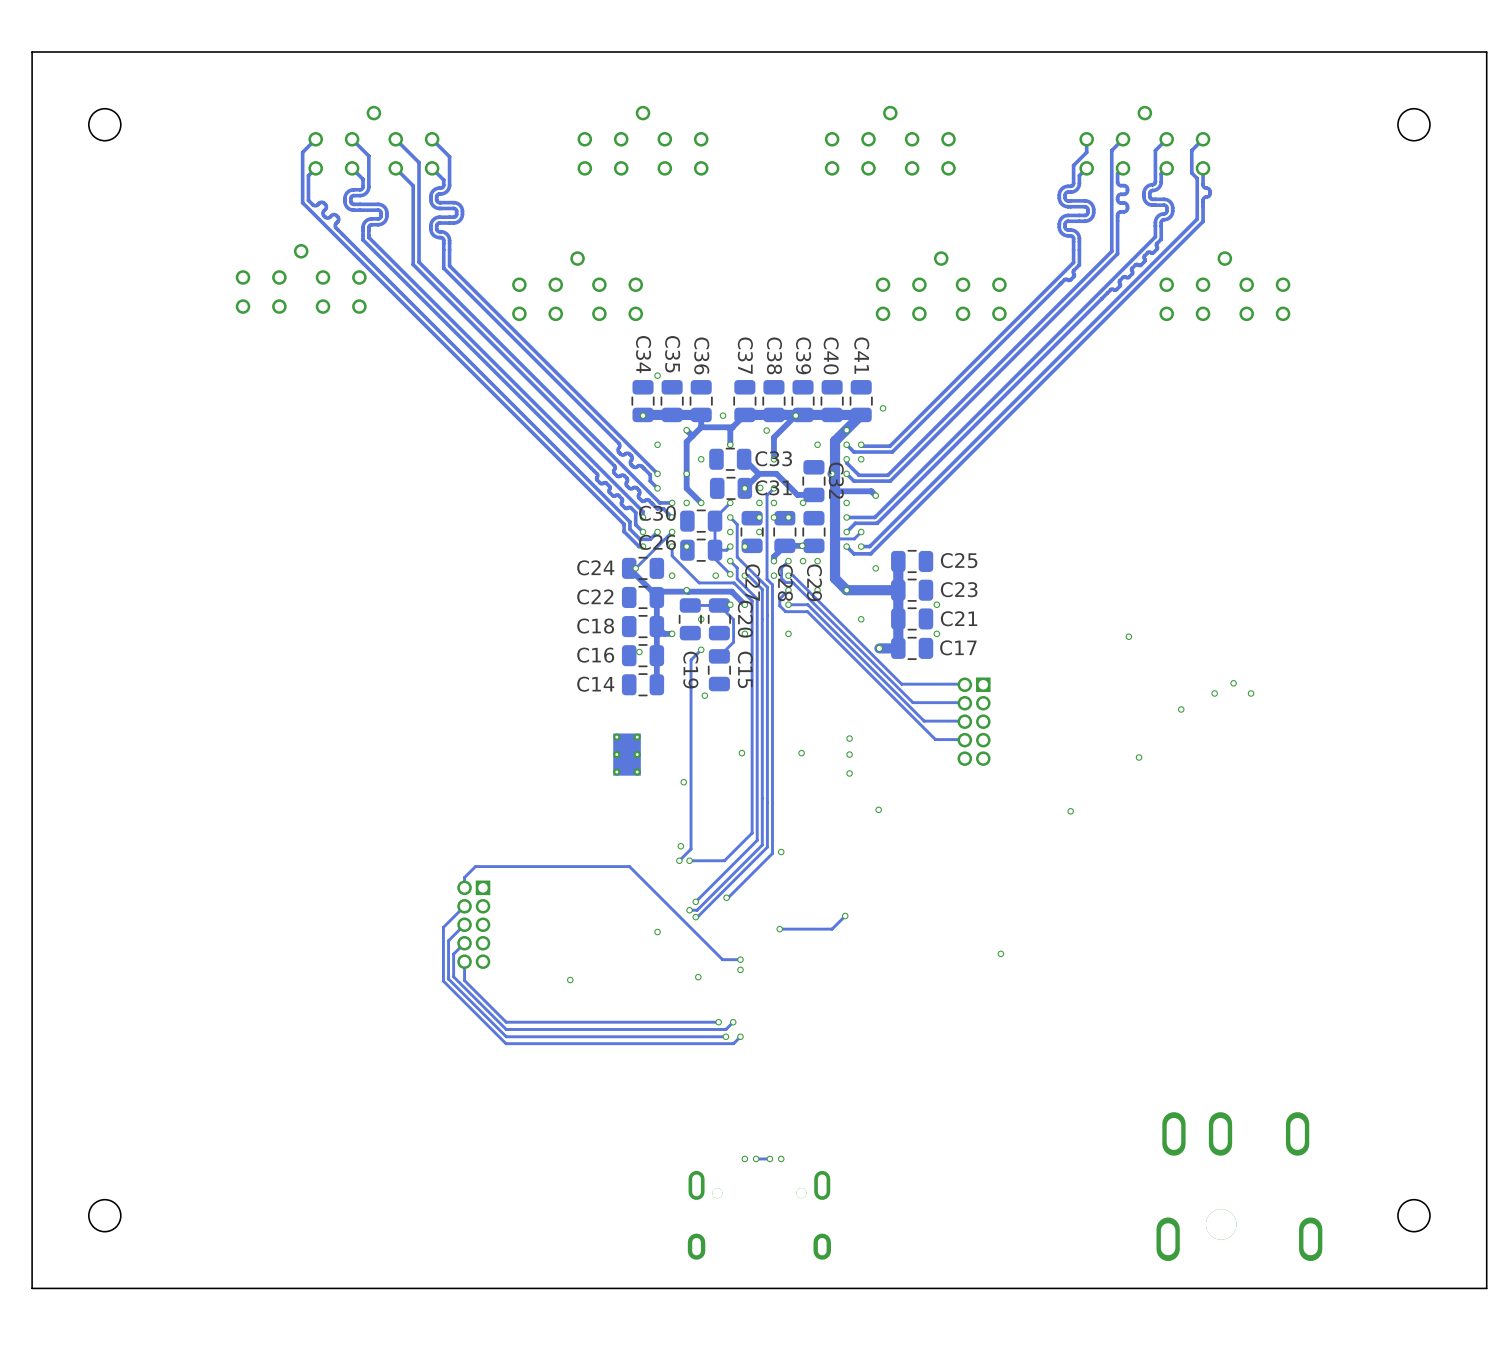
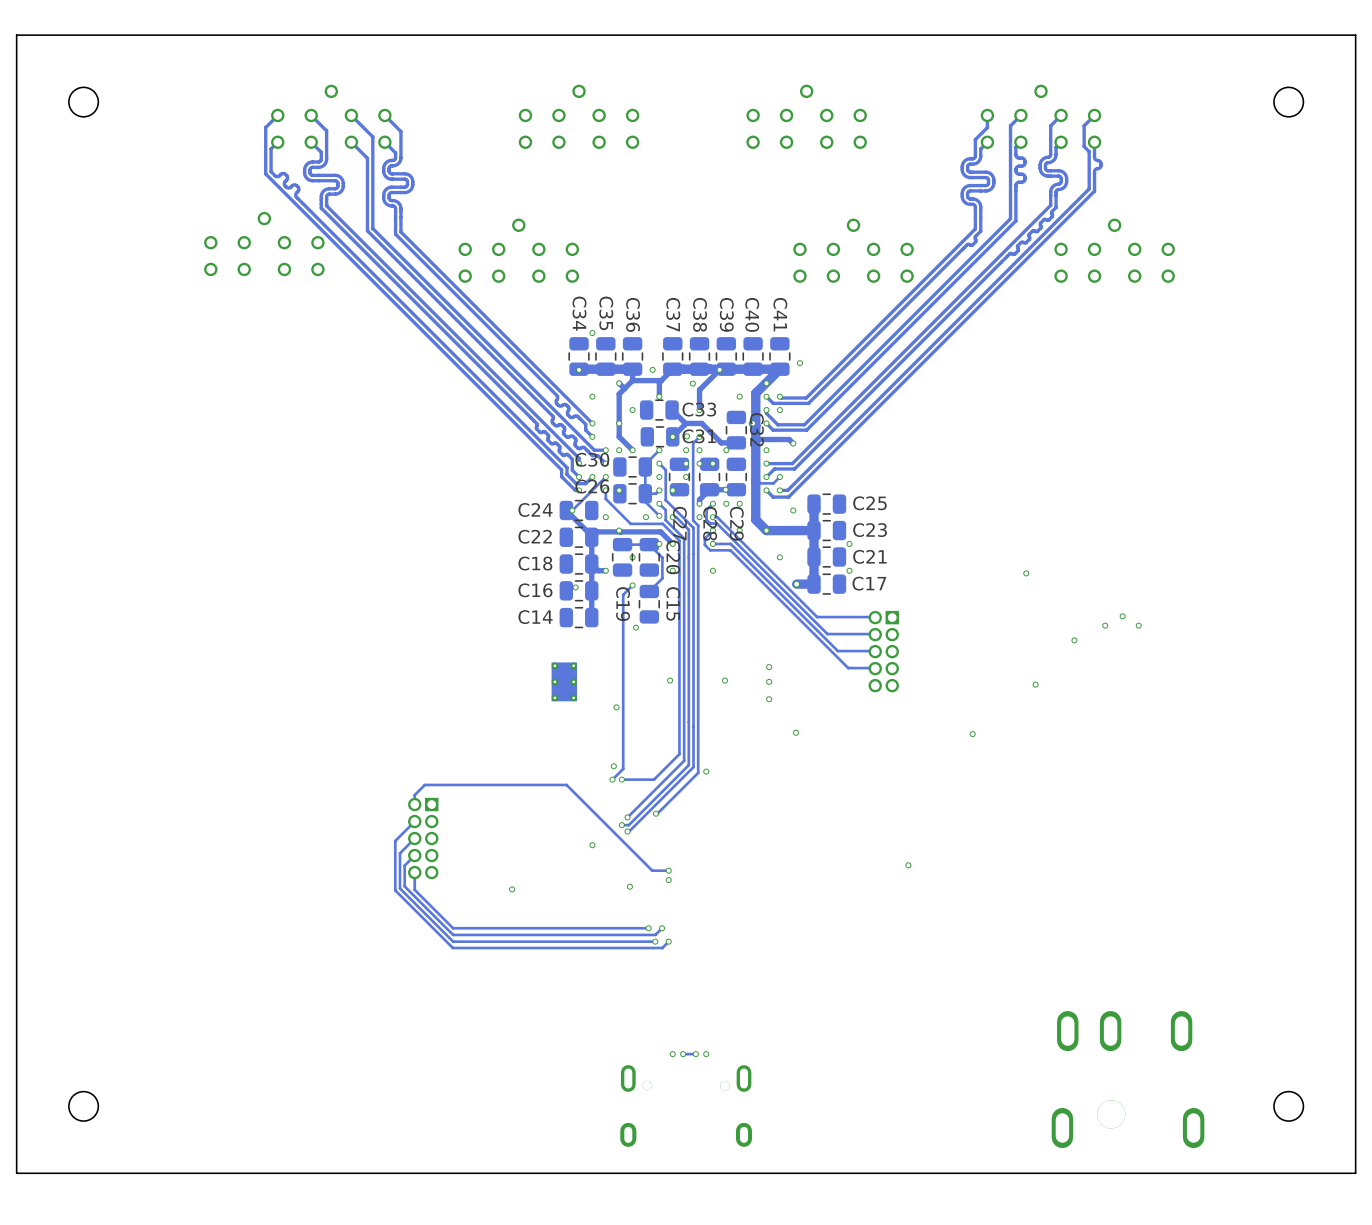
track: (845, 916) (832, 929) (779, 929) -> none
via: (845, 916) -> none
via: (779, 929) -> none

